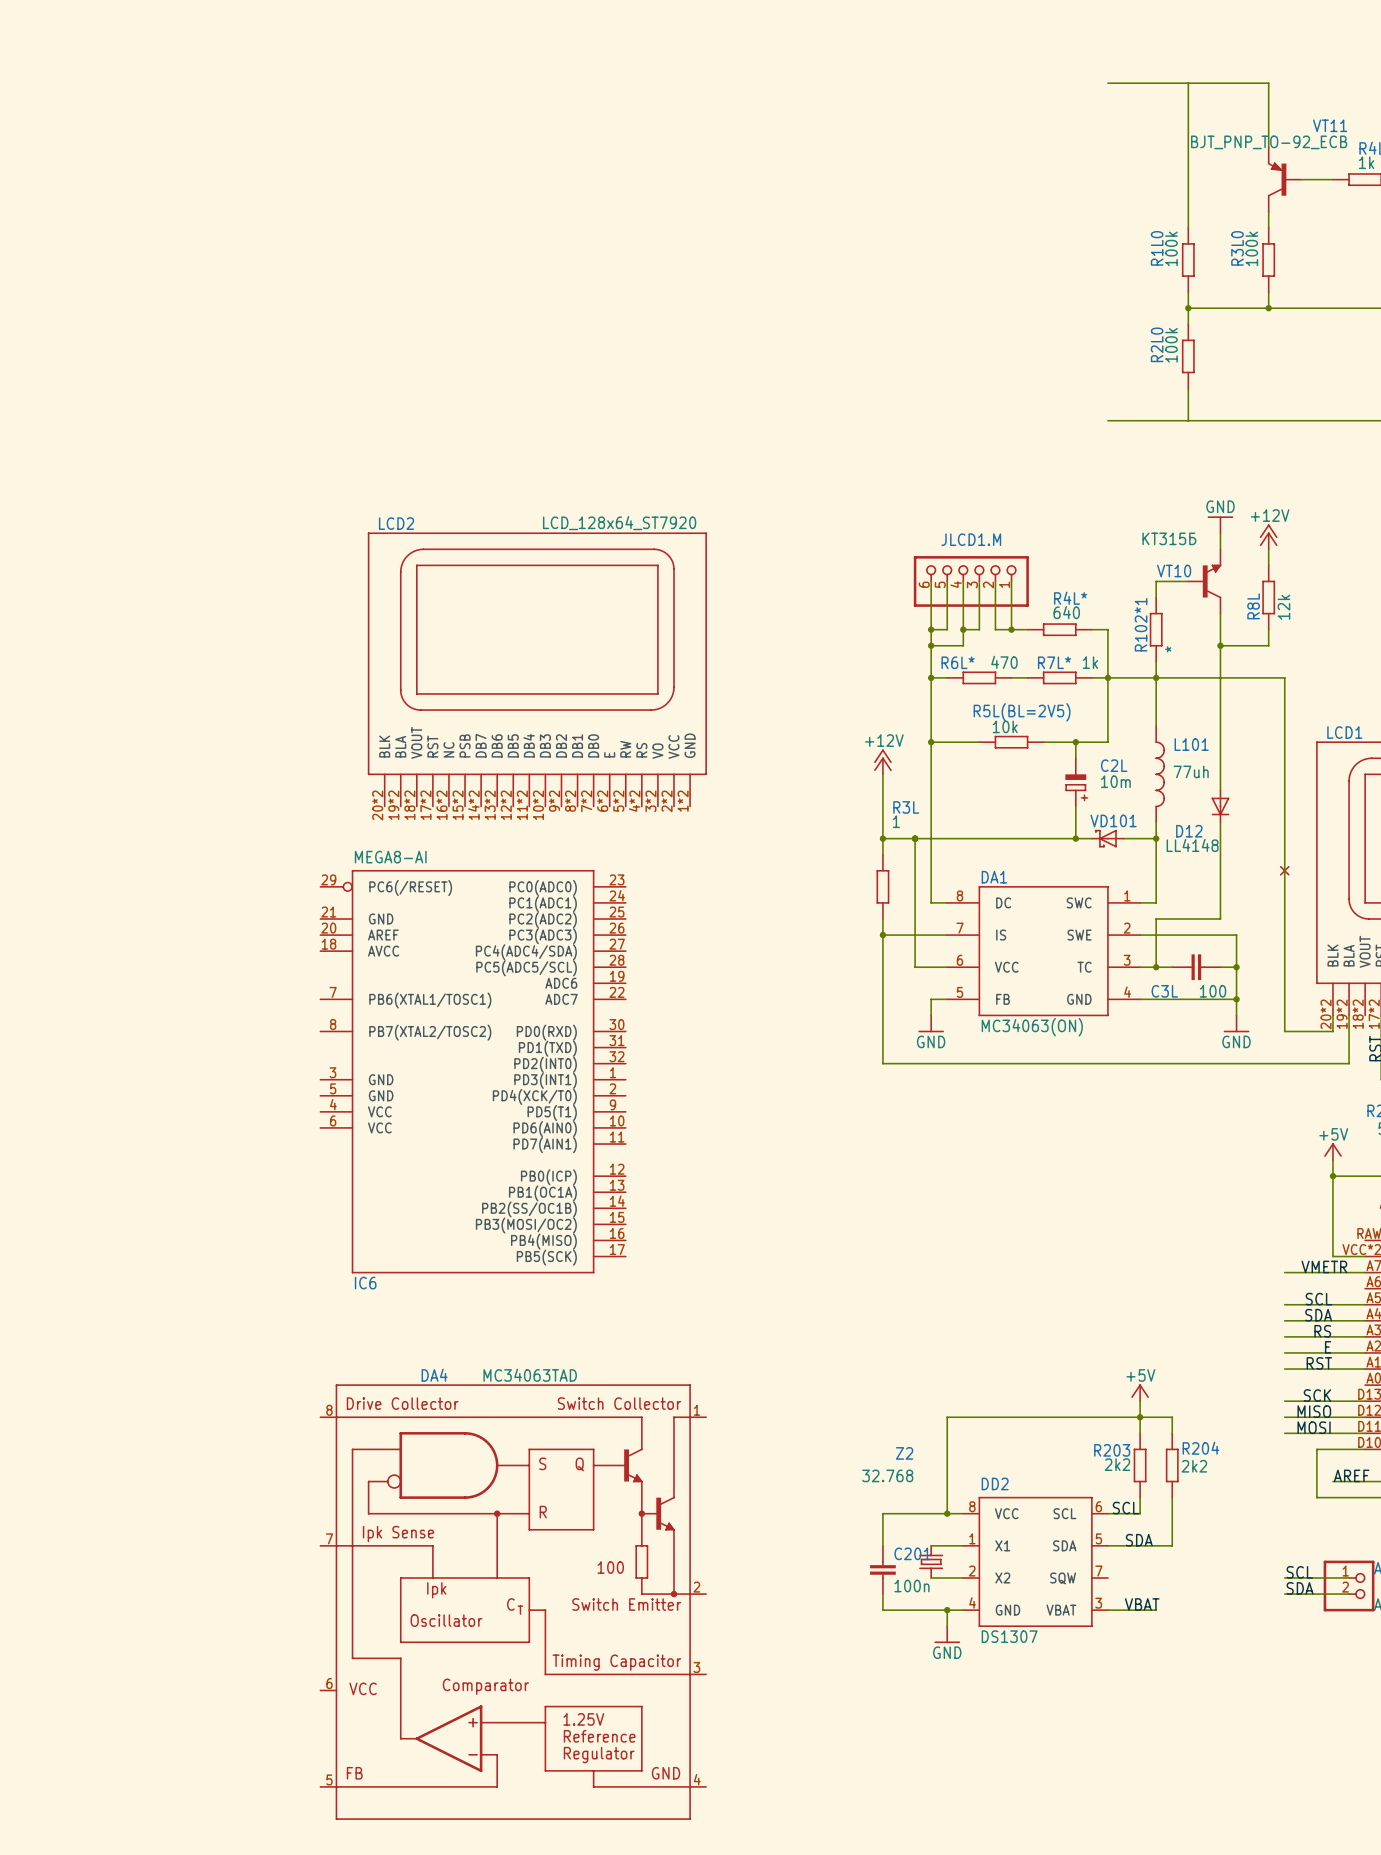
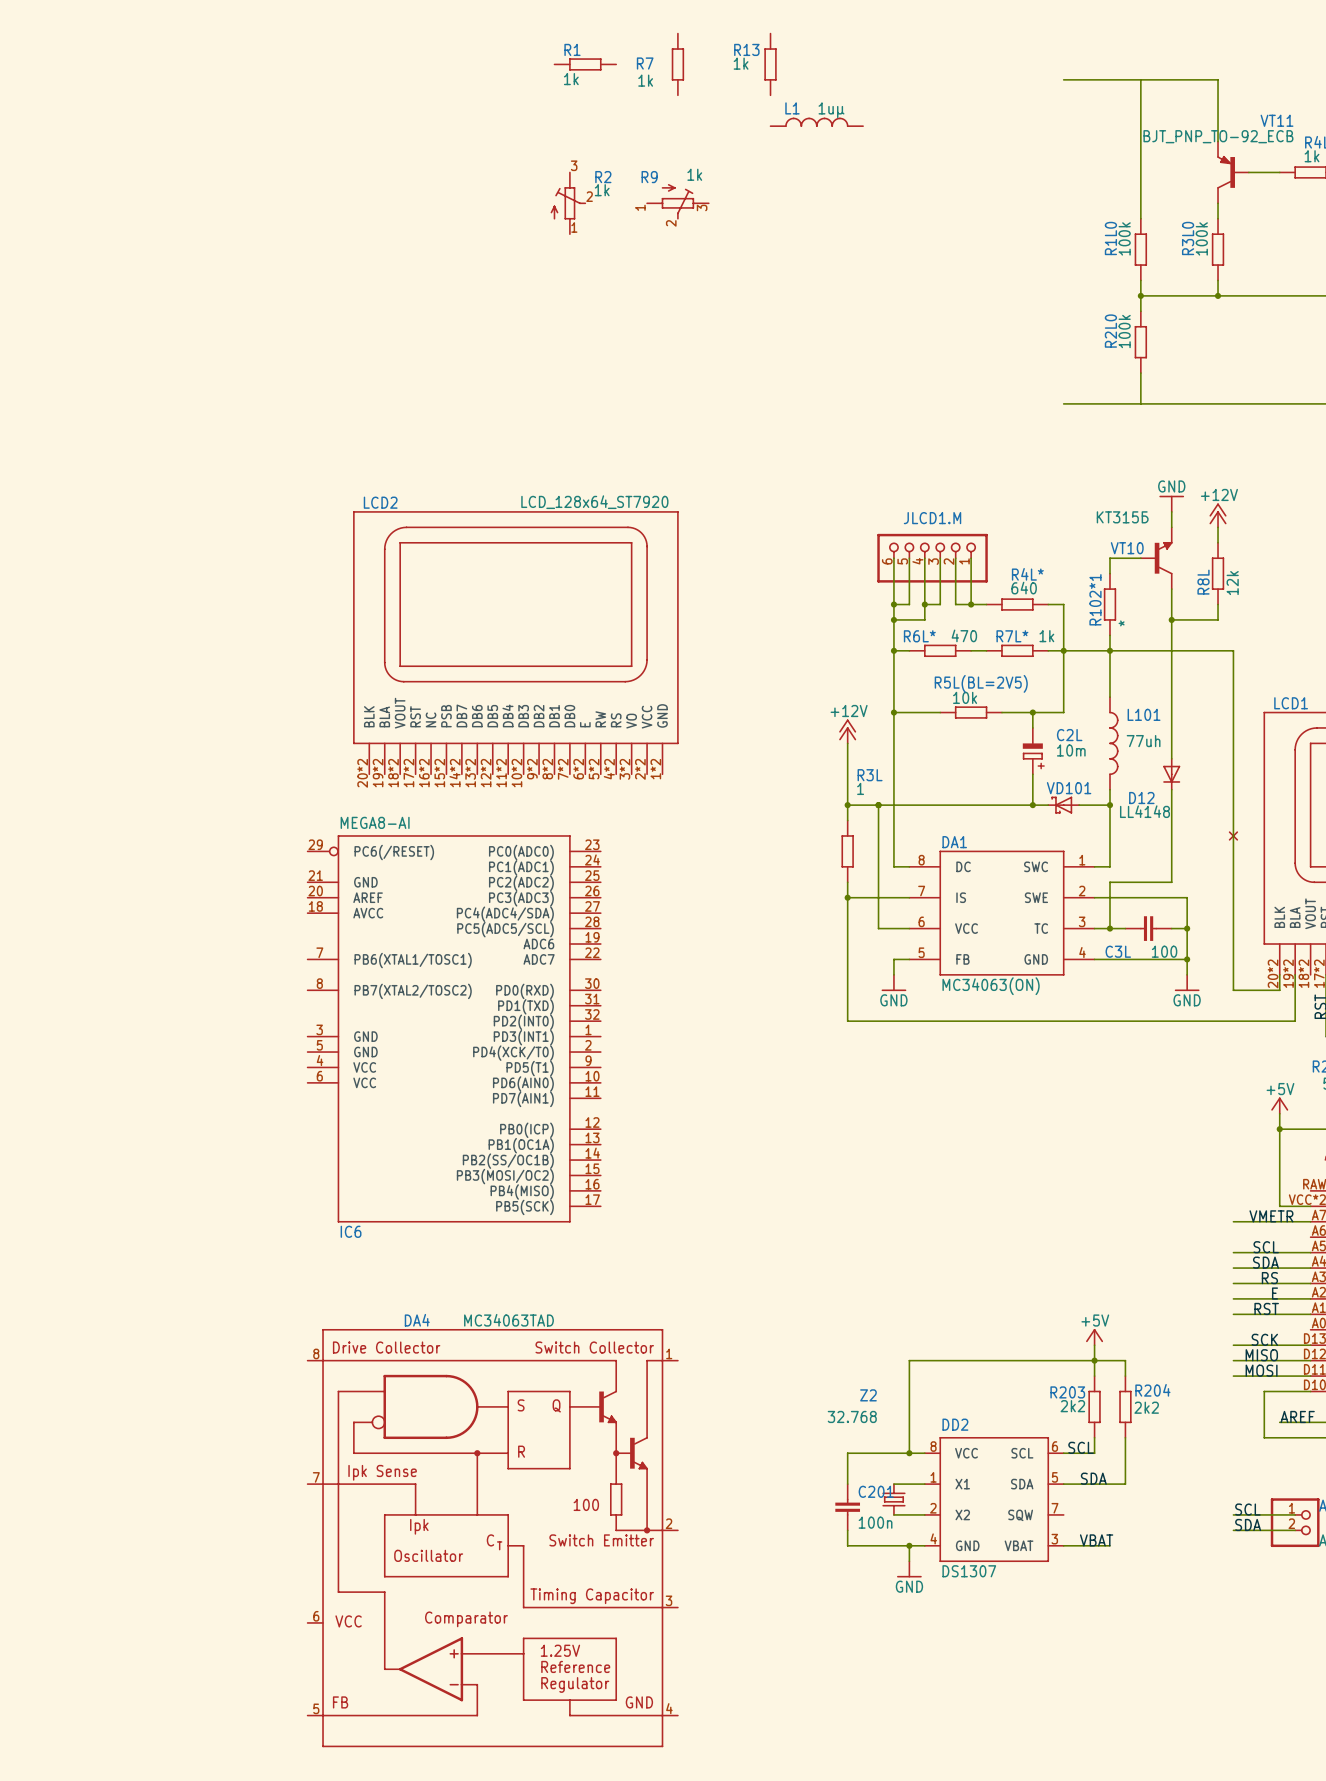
R1: none -> 1k (585, 64)
R7: none -> 1k (677, 64)
R13: none -> 1k (770, 64)
L1: none -> 1uµ (816, 122)
R9: none -> 1k (677, 201)
R2: none -> 1k (568, 203)

